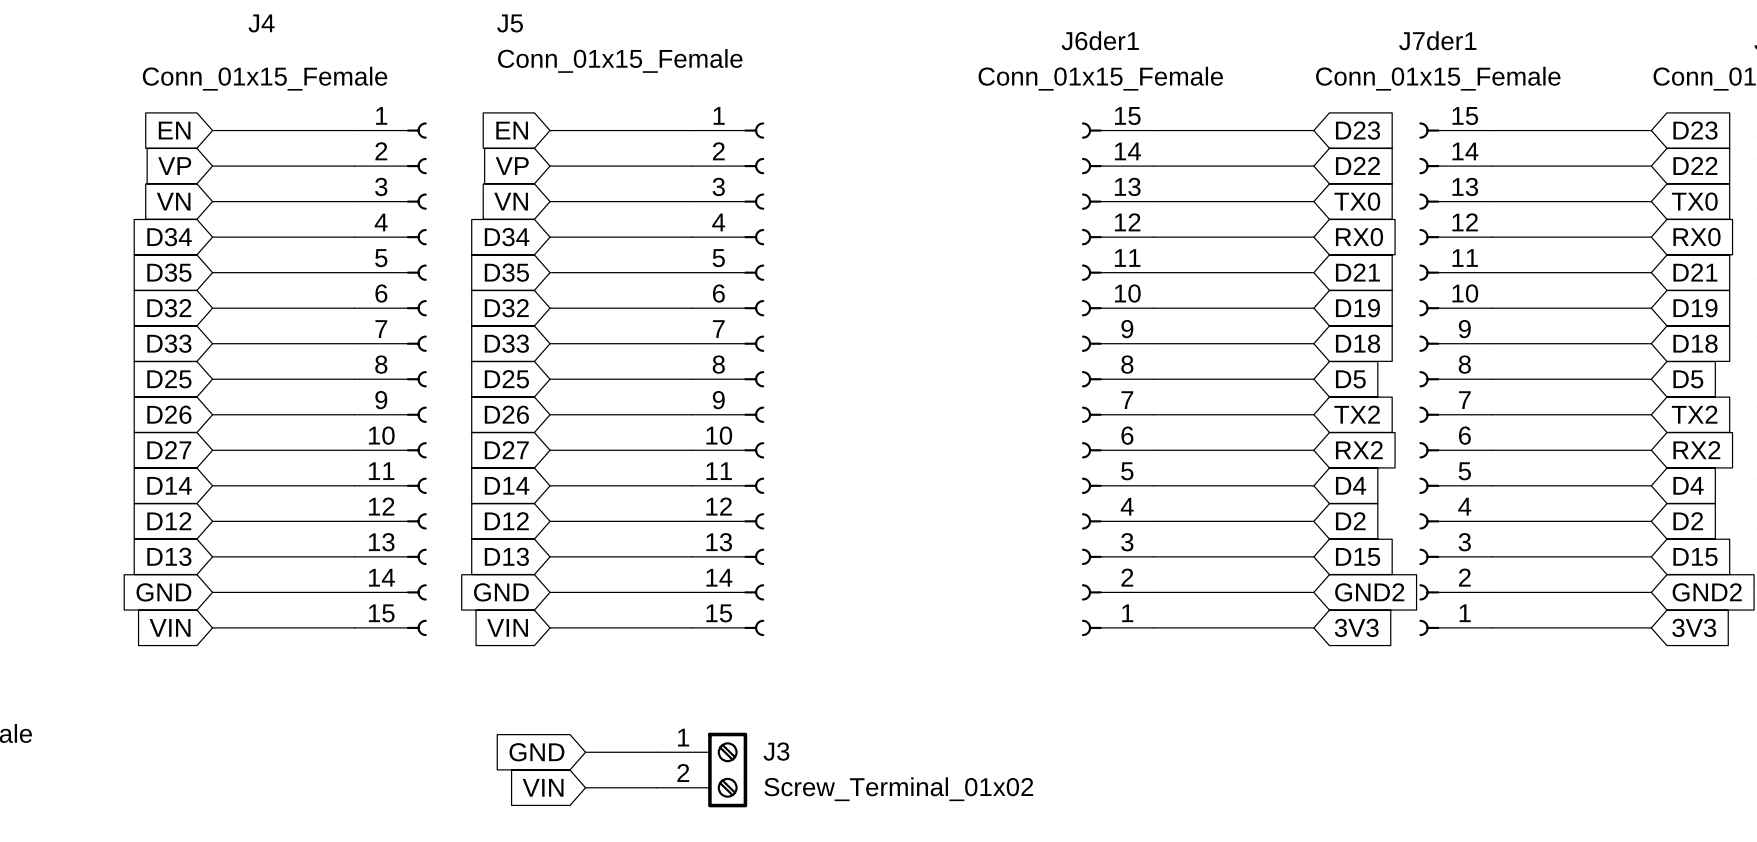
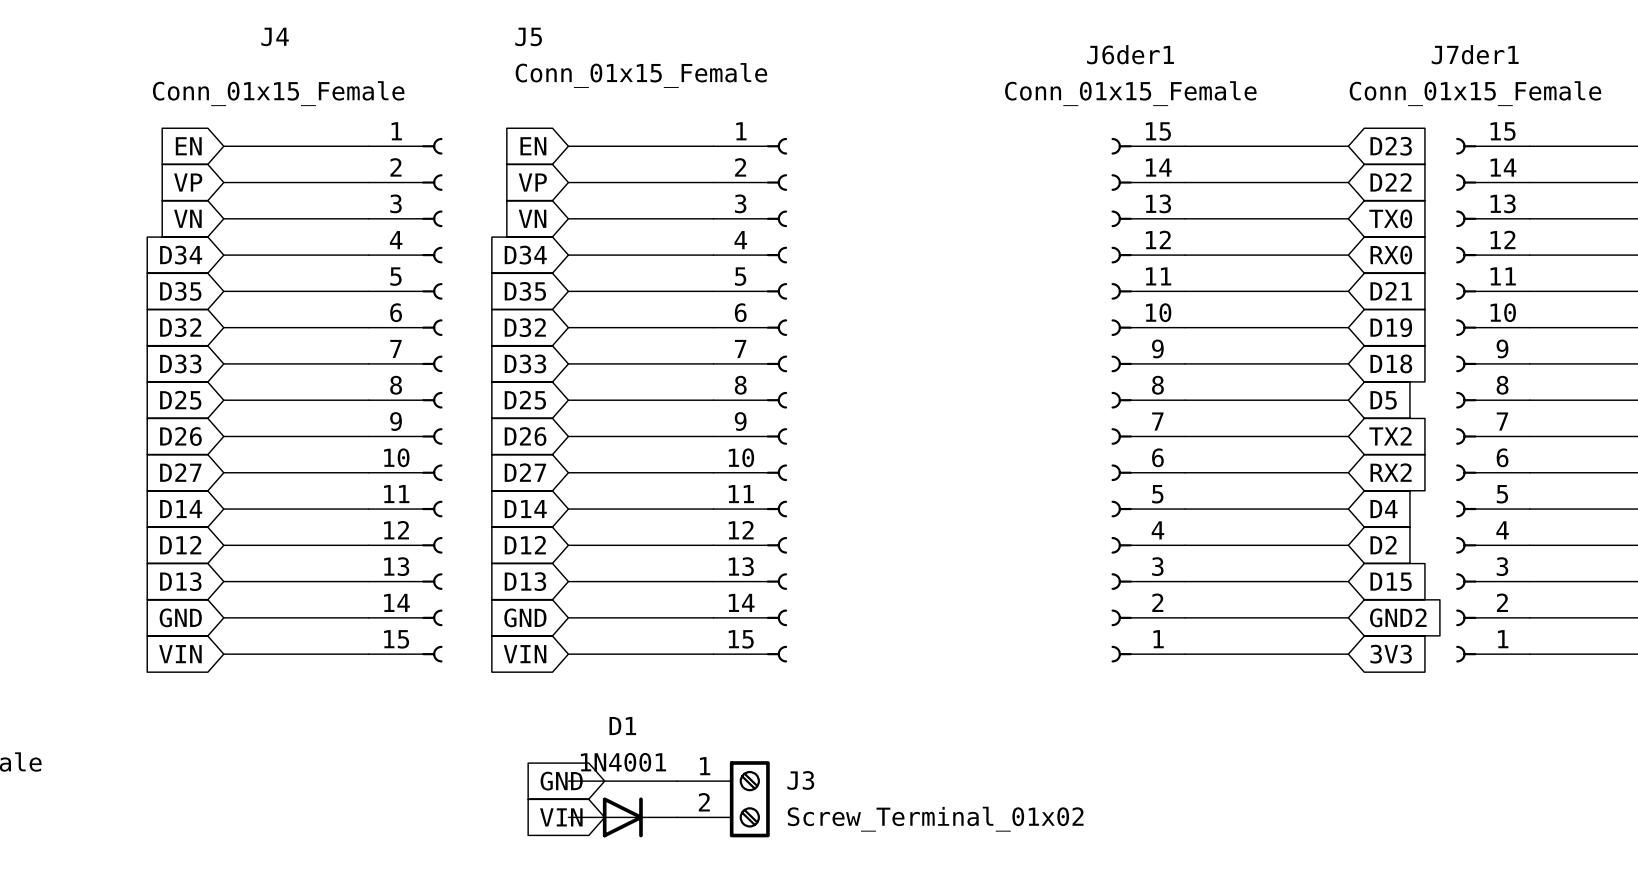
wire: none -> (568, 781) (604, 781)
D1: none -> 1N4001 (622, 817)

